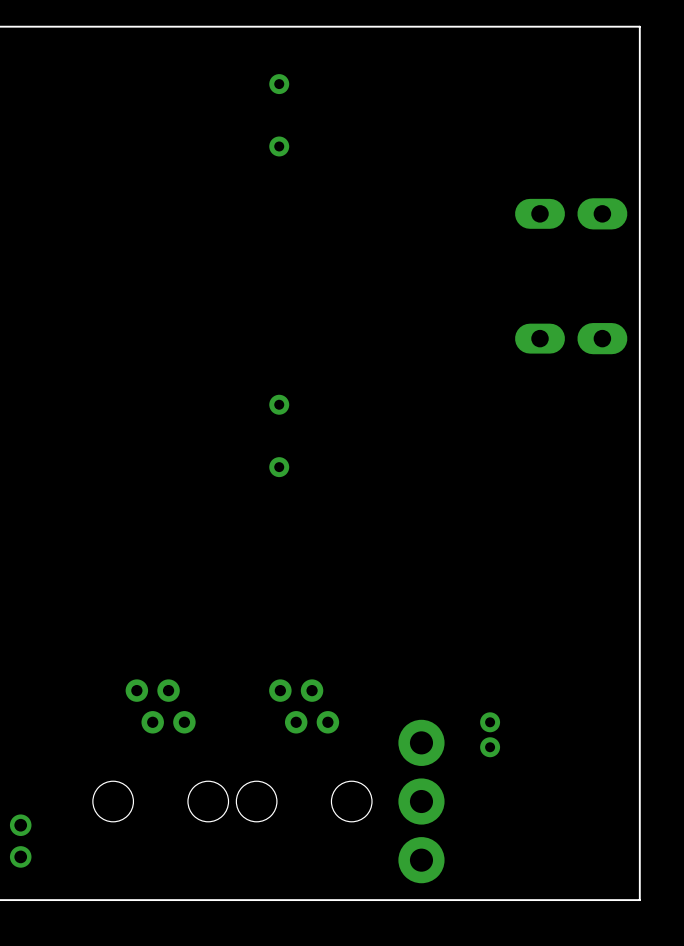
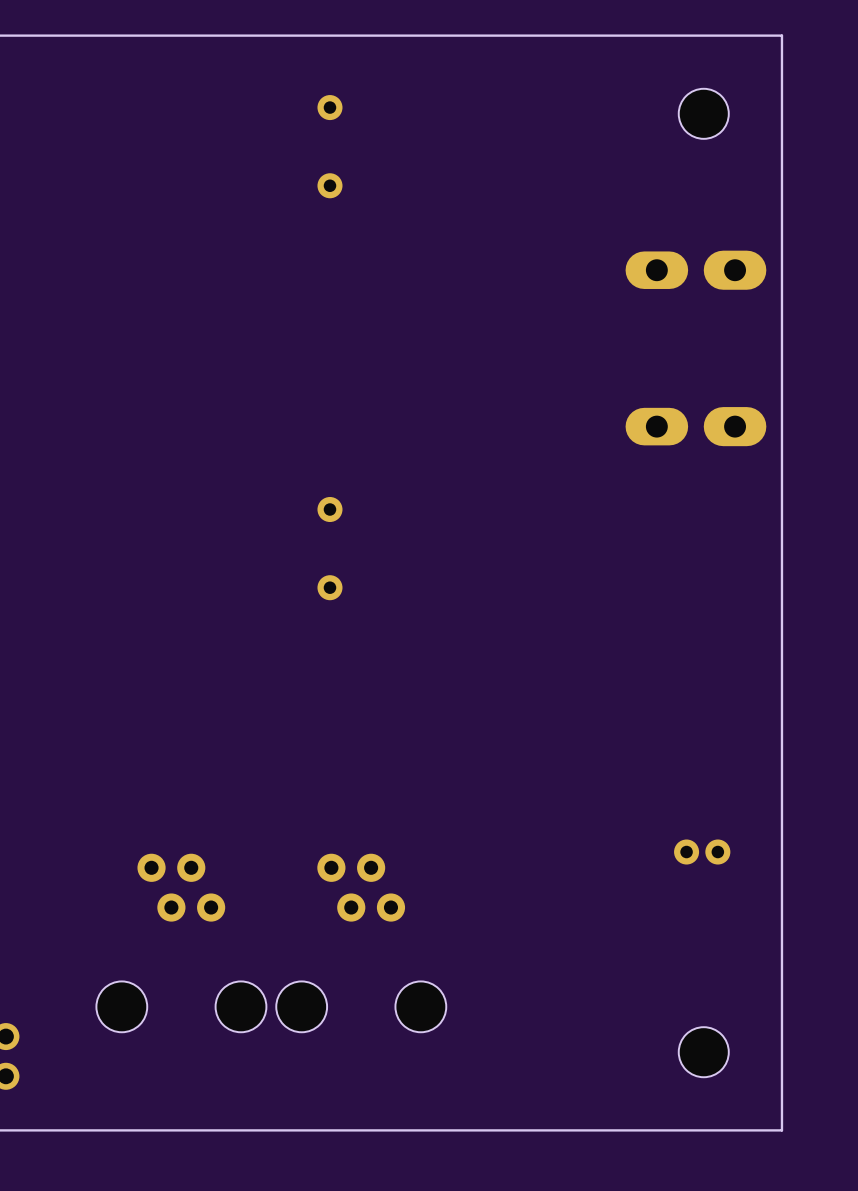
part: none -> (703, 113)
part rotation: 0° (490, 734) -> 90° clockwise (702, 852)
part position: (490, 734) -> (702, 852)
part: (421, 801) -> none
part: none -> (703, 1052)

